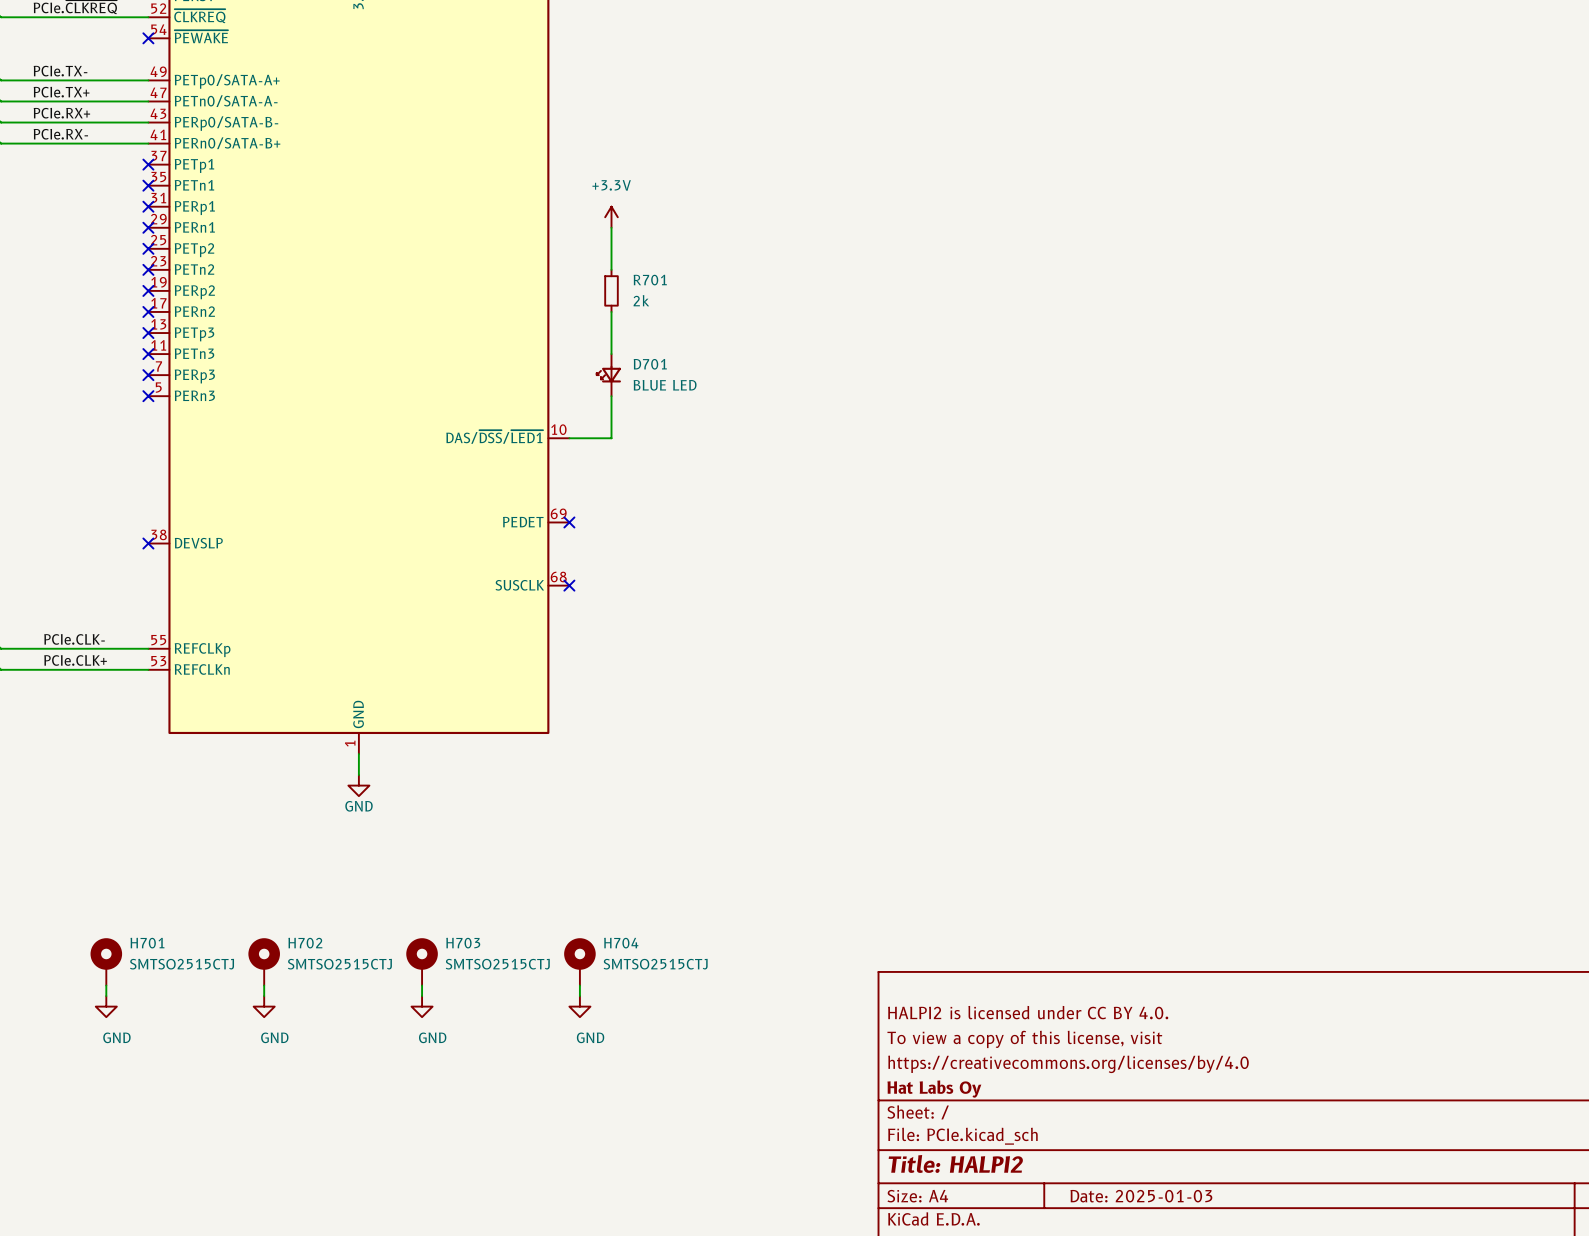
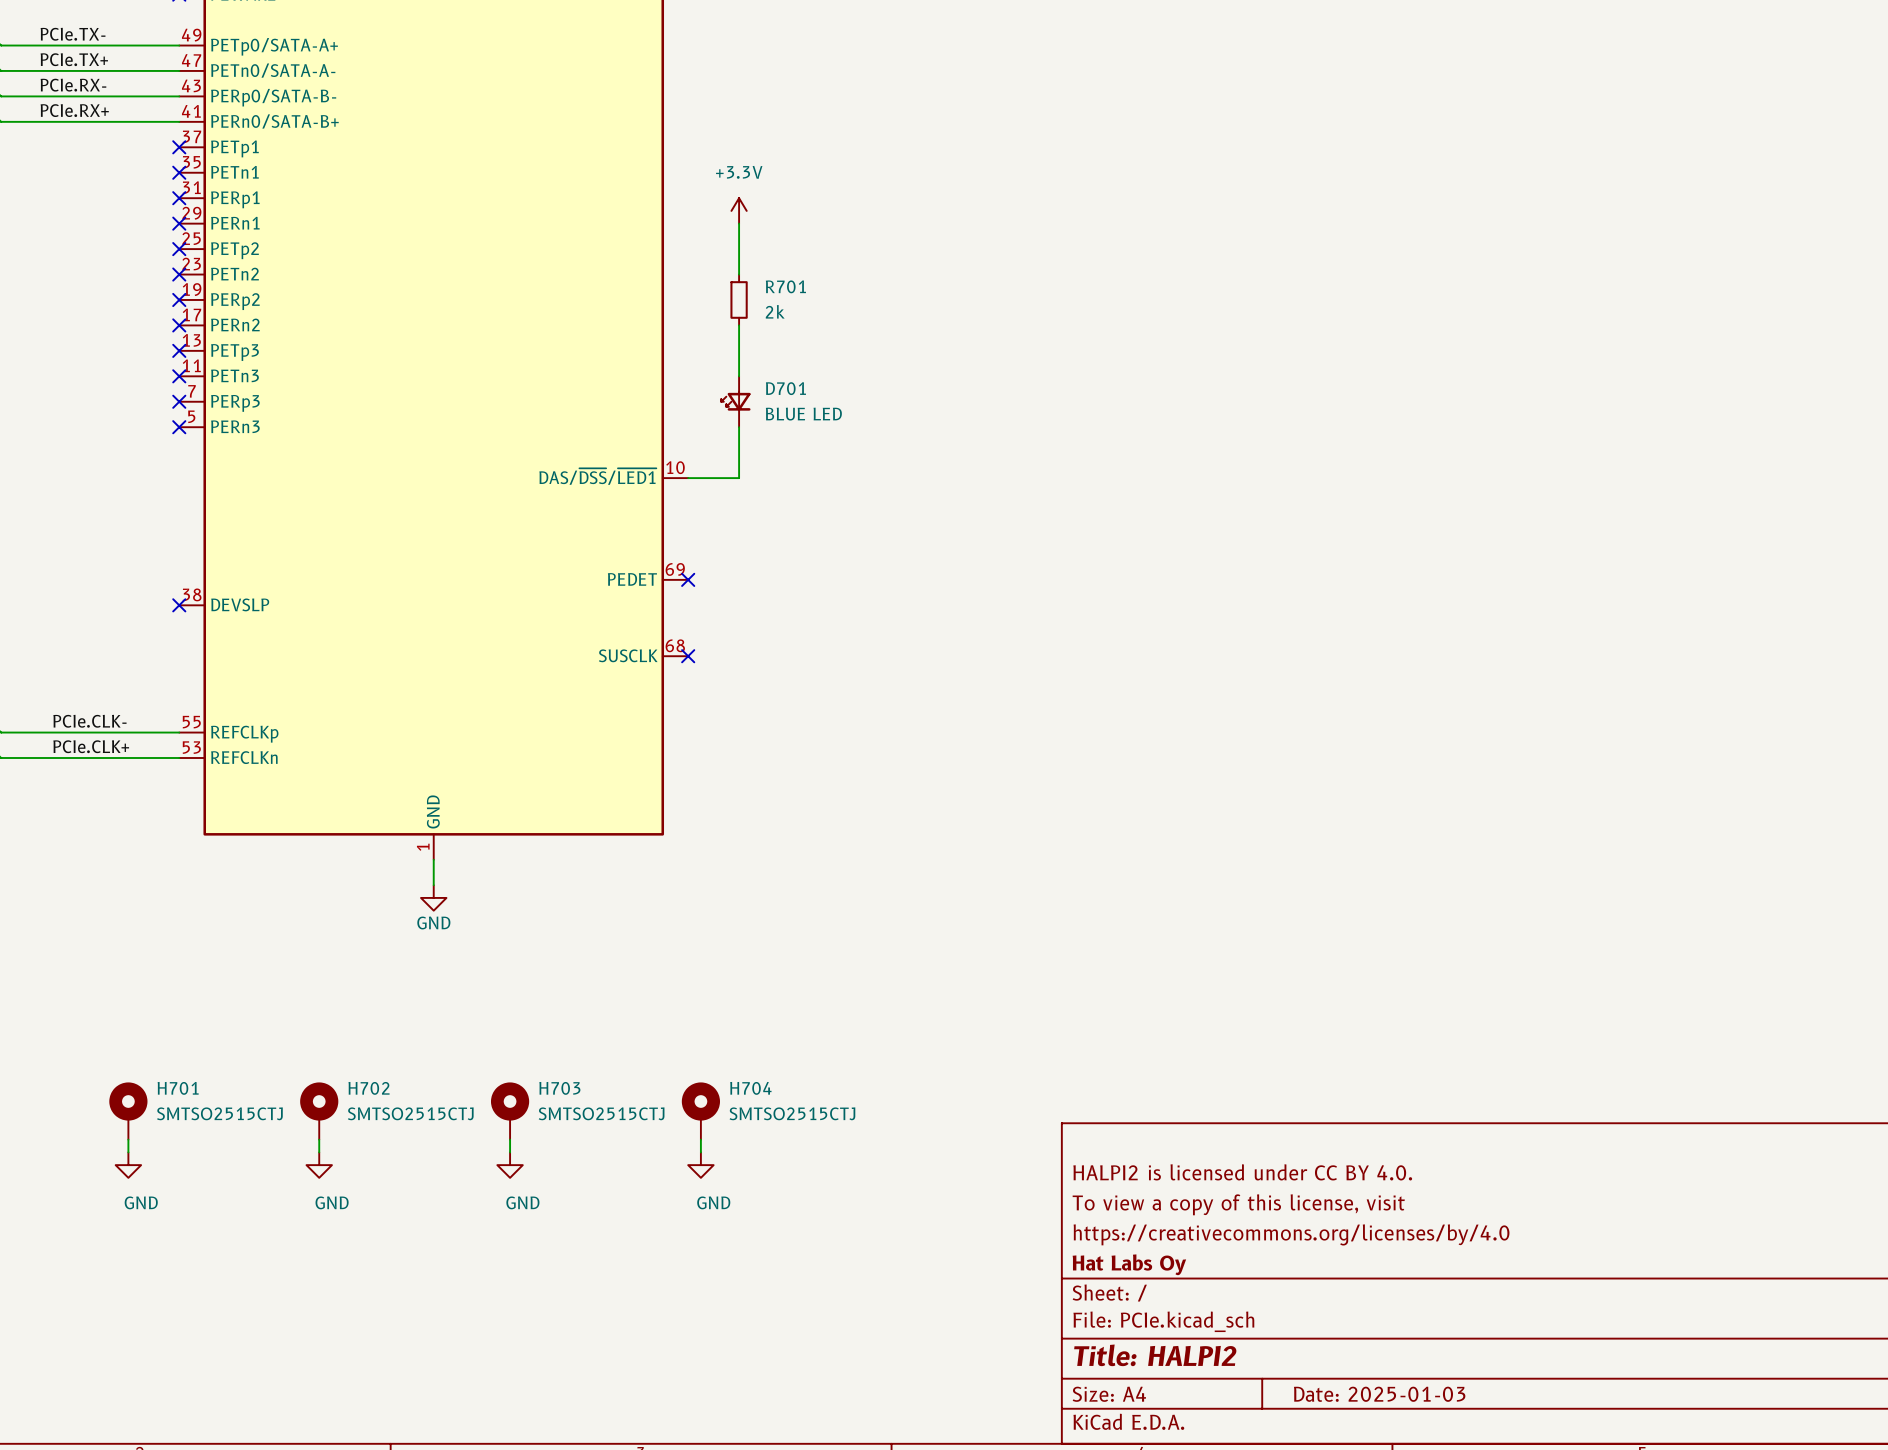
label: PCIe.RX+ (61, 113) -> PCIe.RX- (73, 85)
label: PCIe.RX- (60, 134) -> PCIe.RX+ (74, 110)

